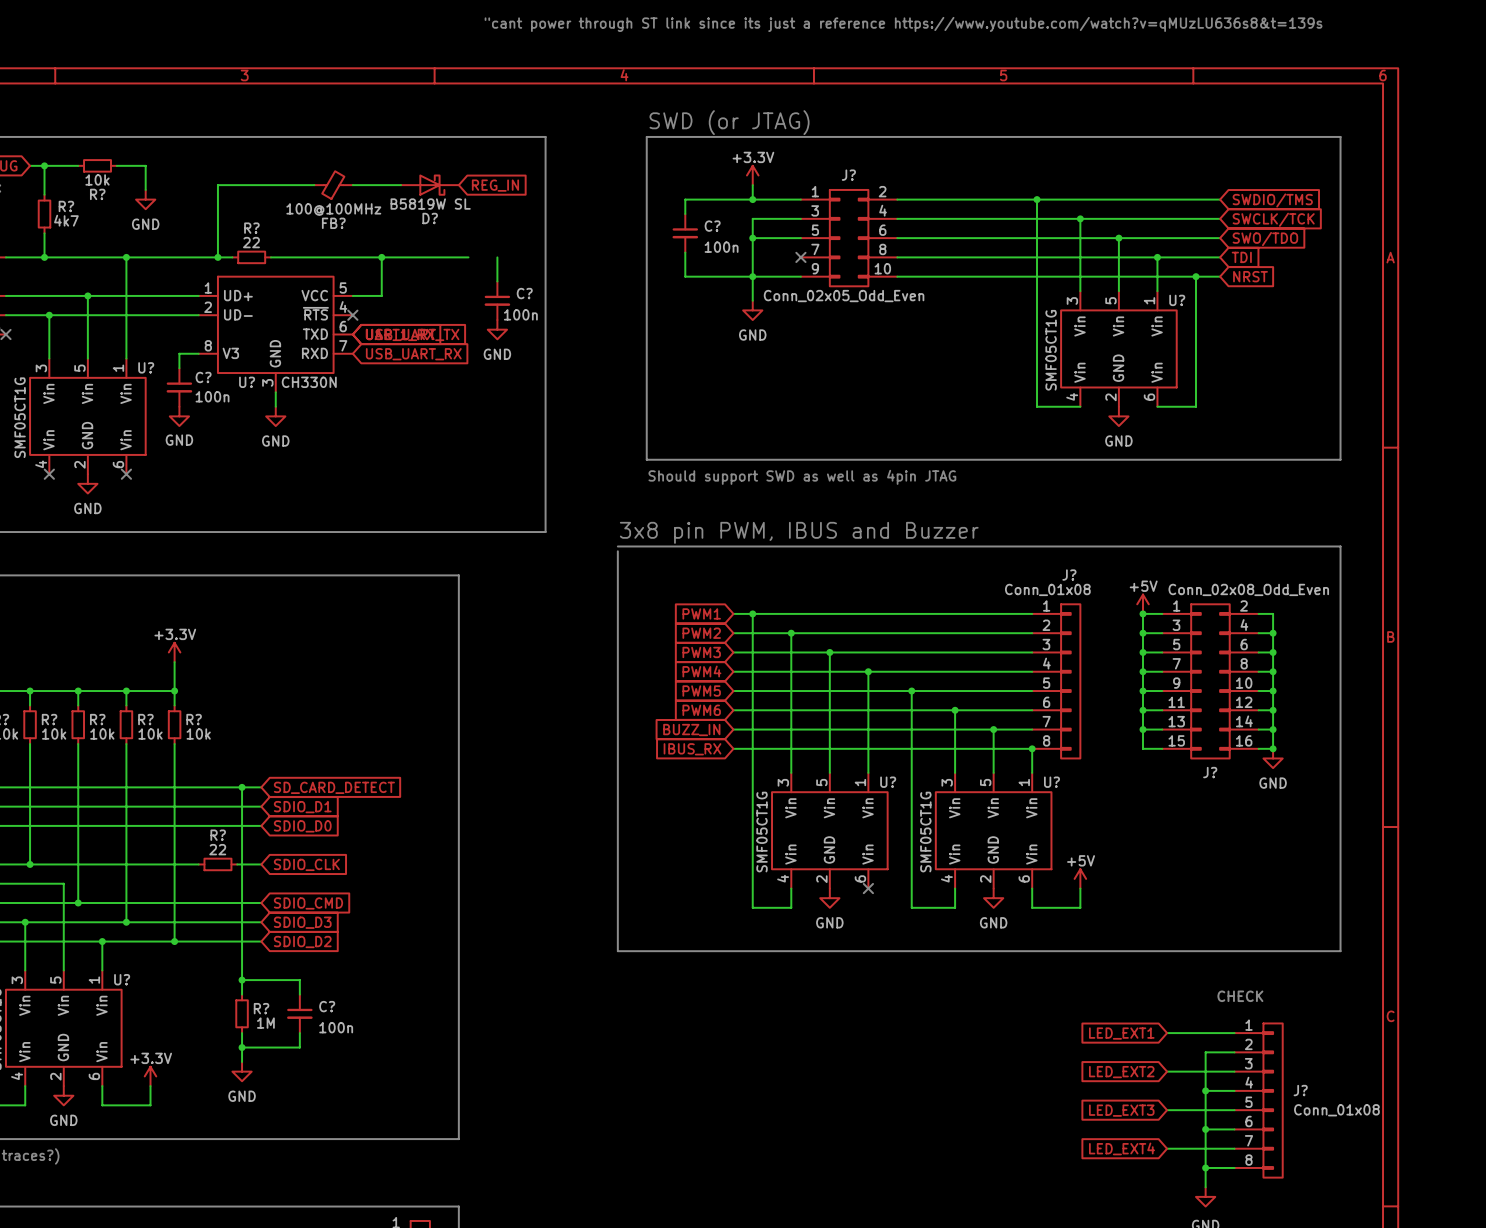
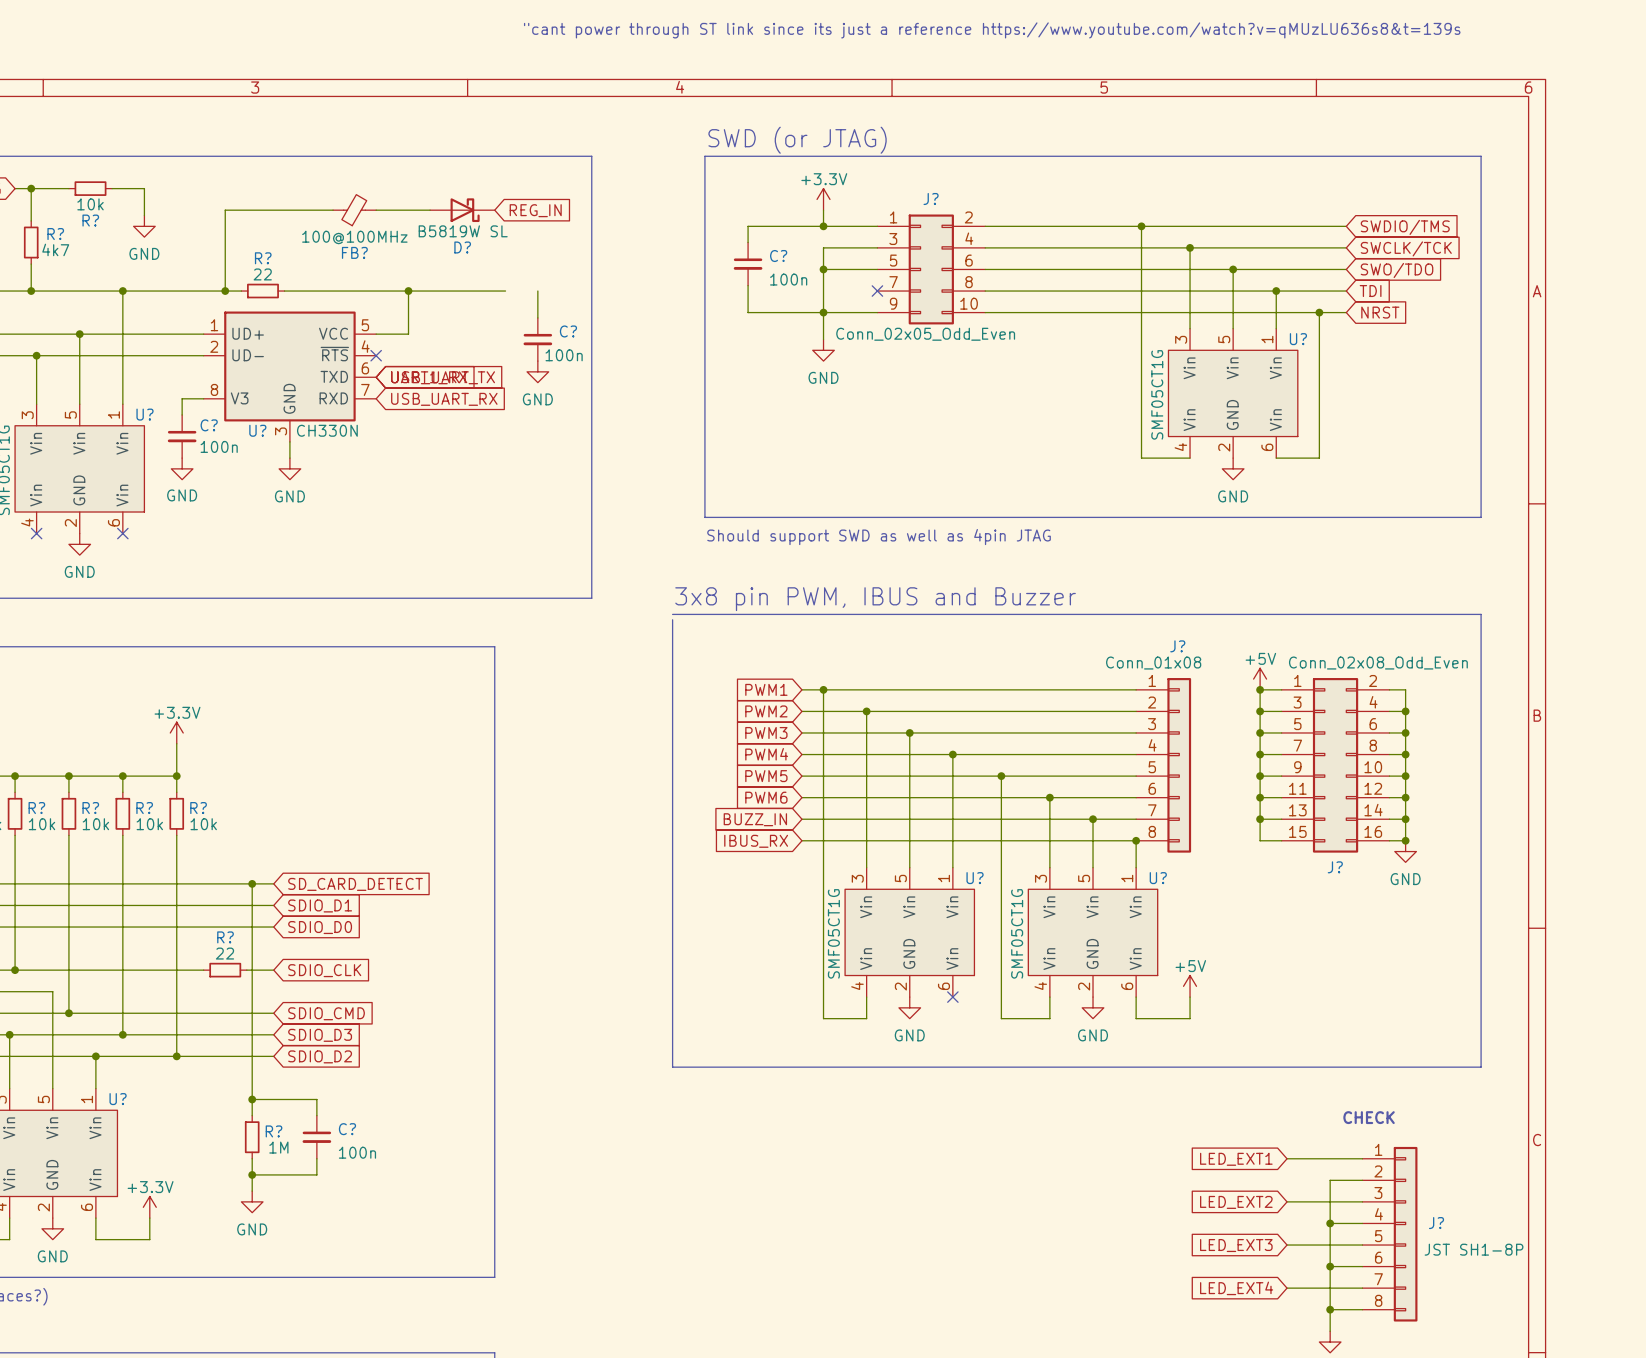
J? value: Conn_01x08 (1336, 1110) -> JST SH1-8P (1474, 1249)

